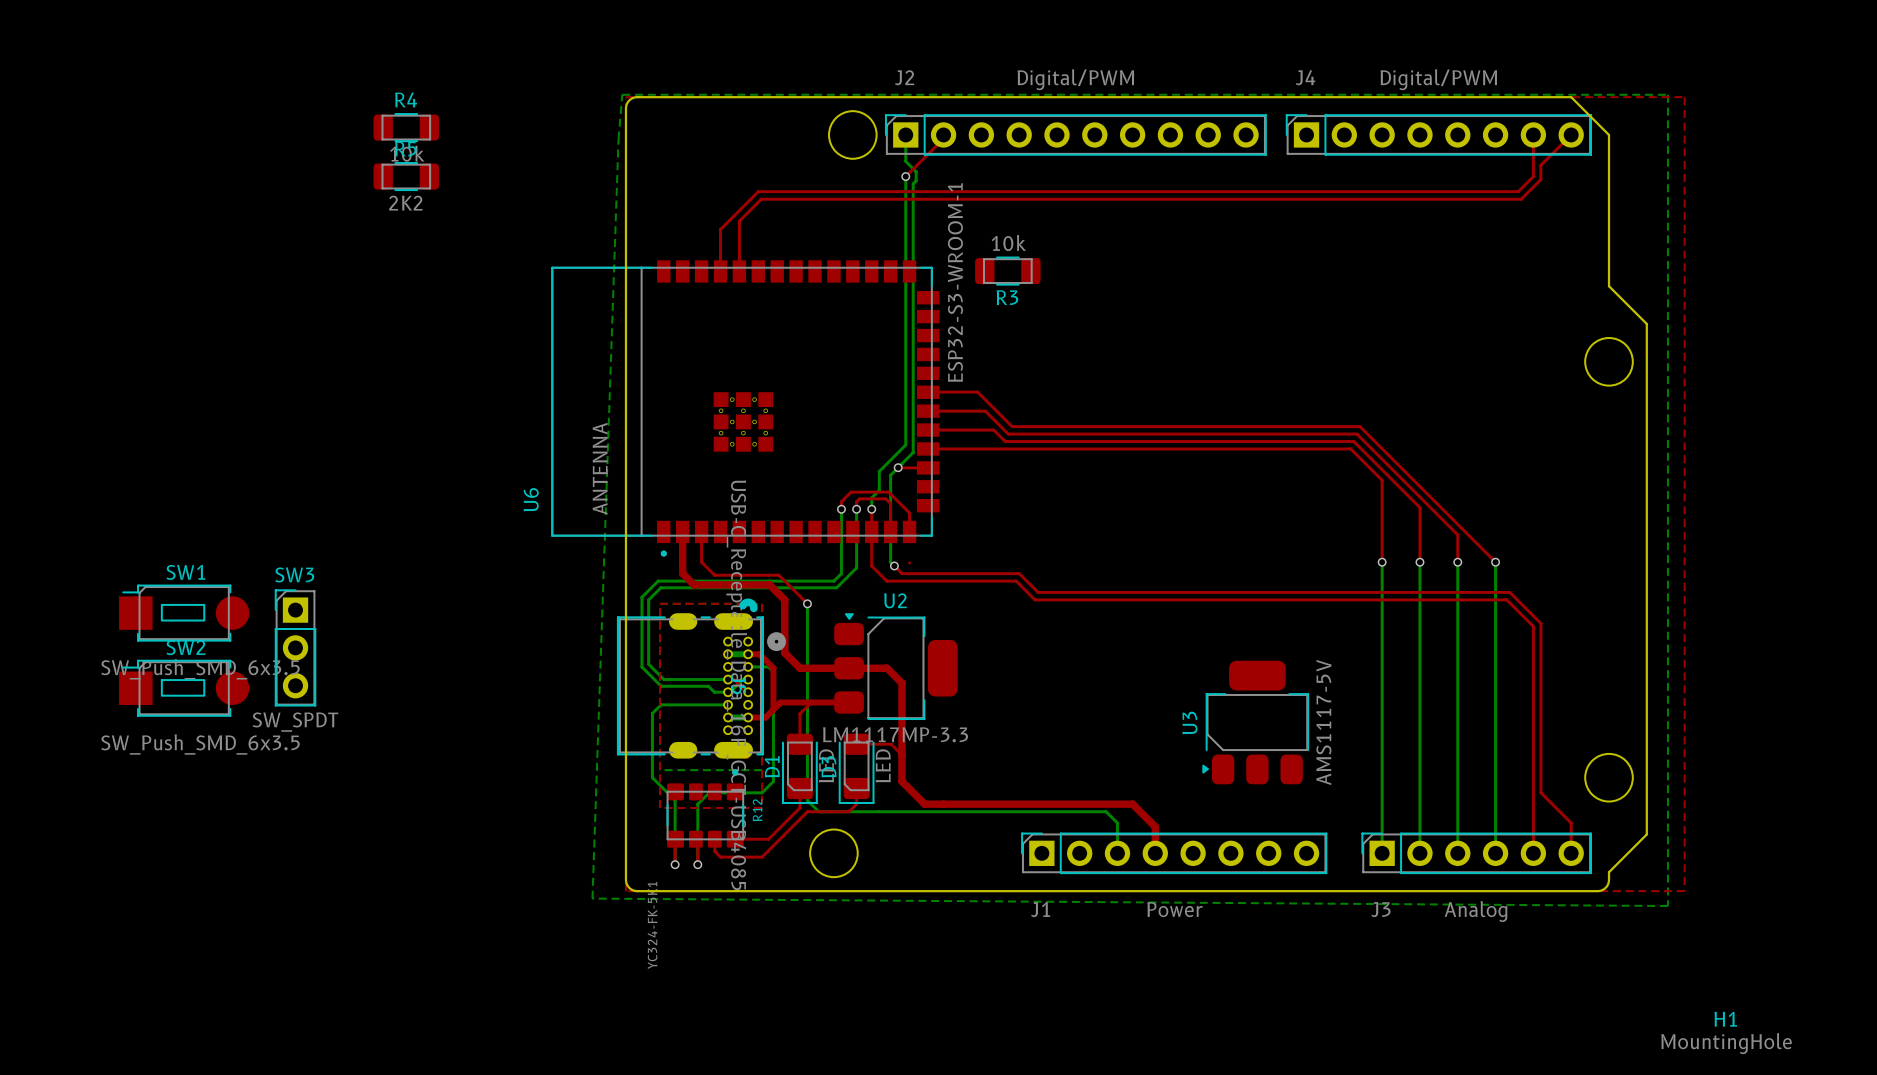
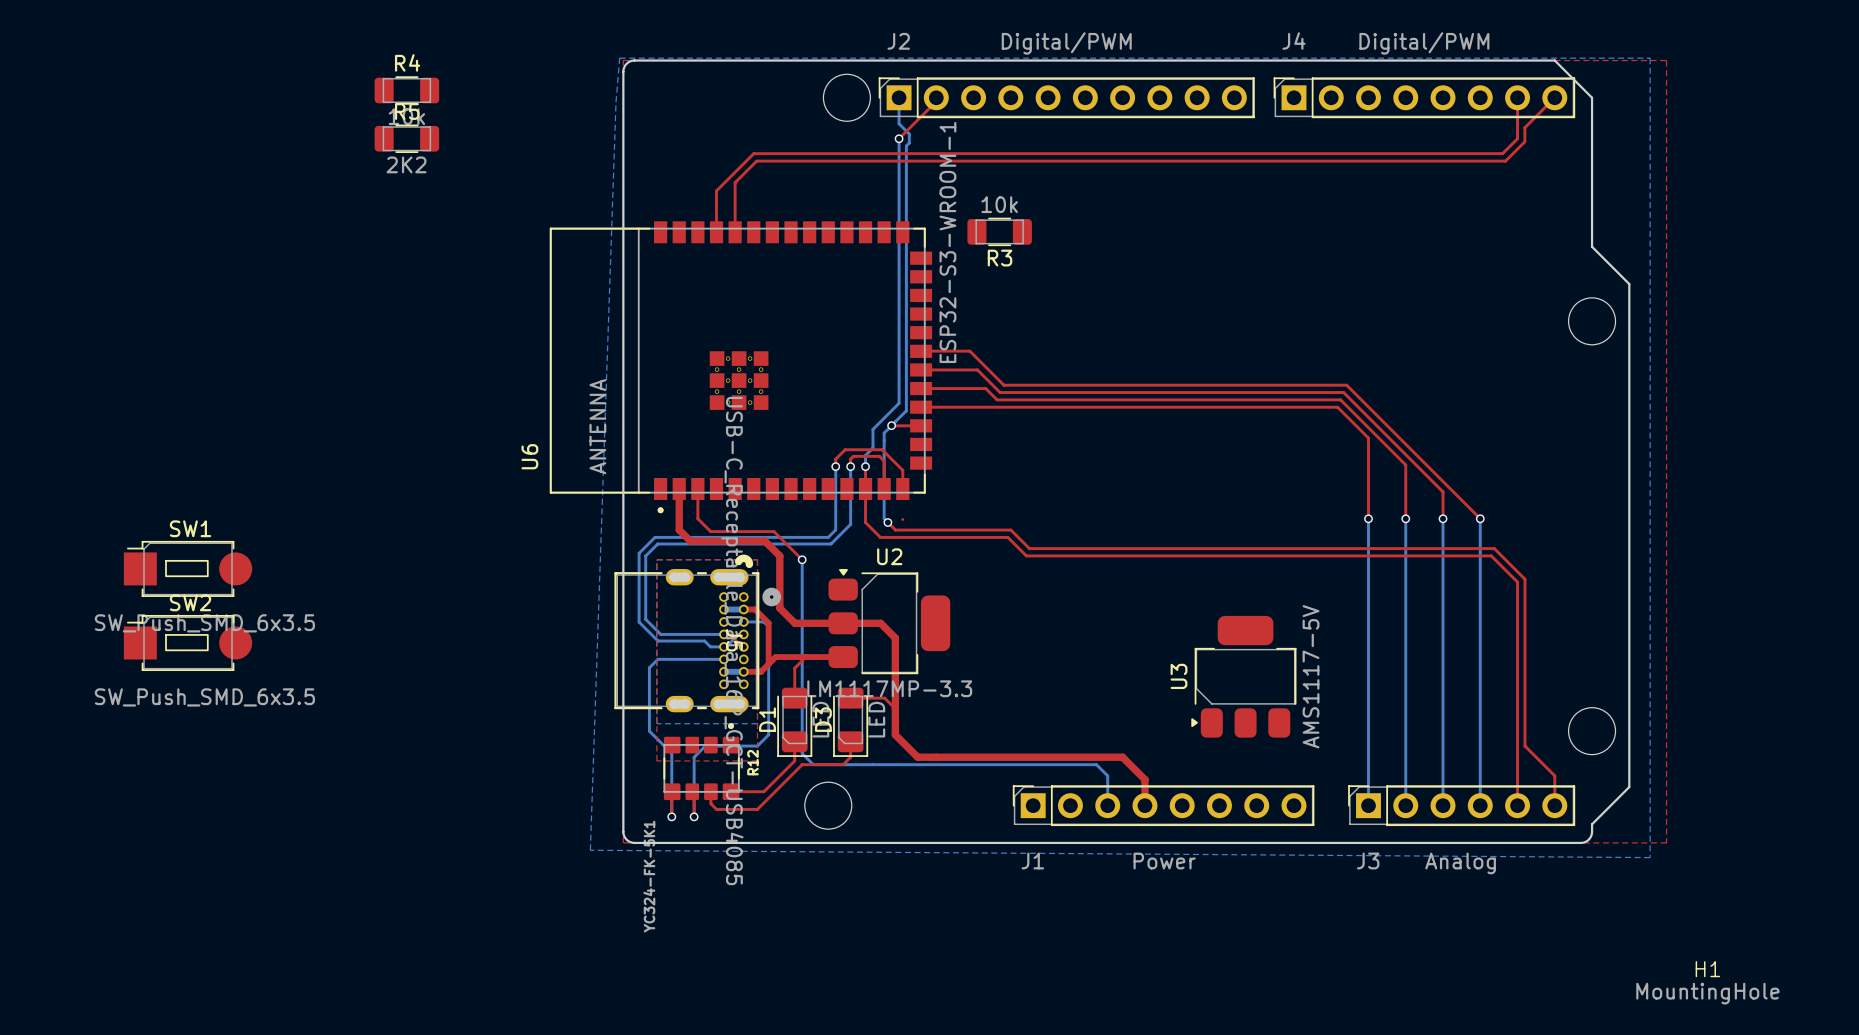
SW3: SW_SPDT (295, 647) -> none

